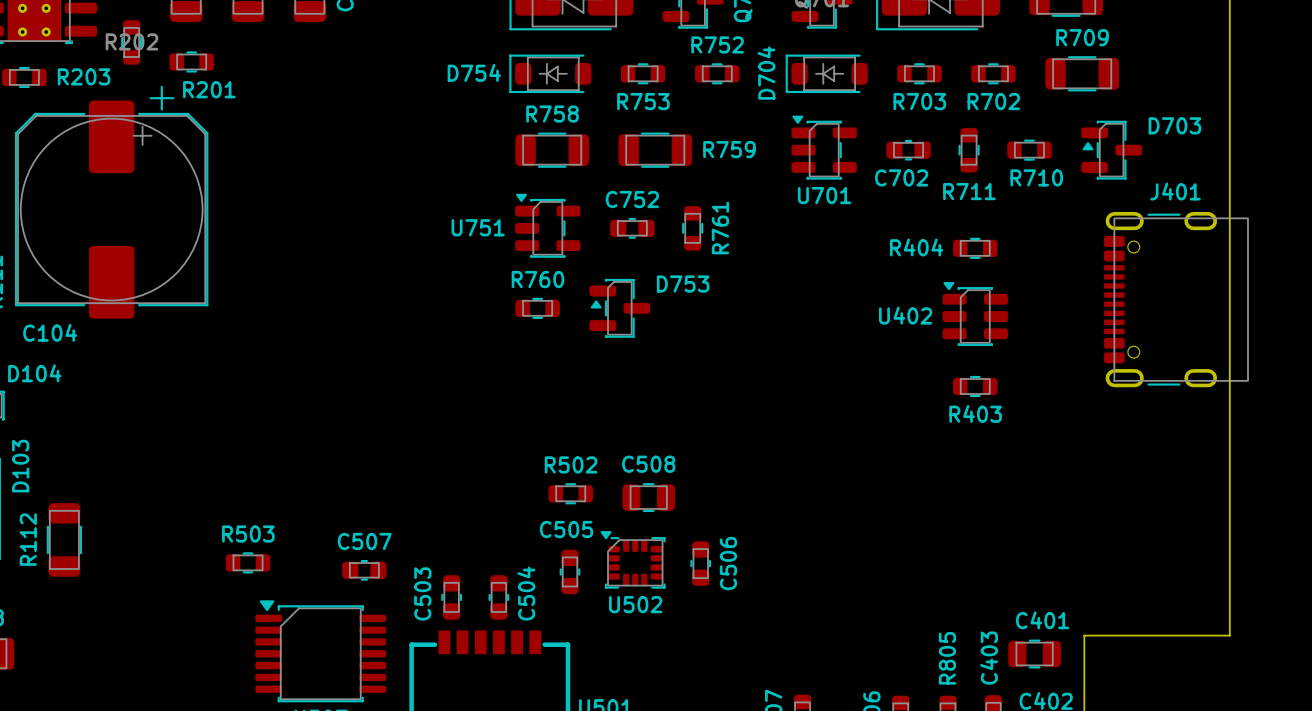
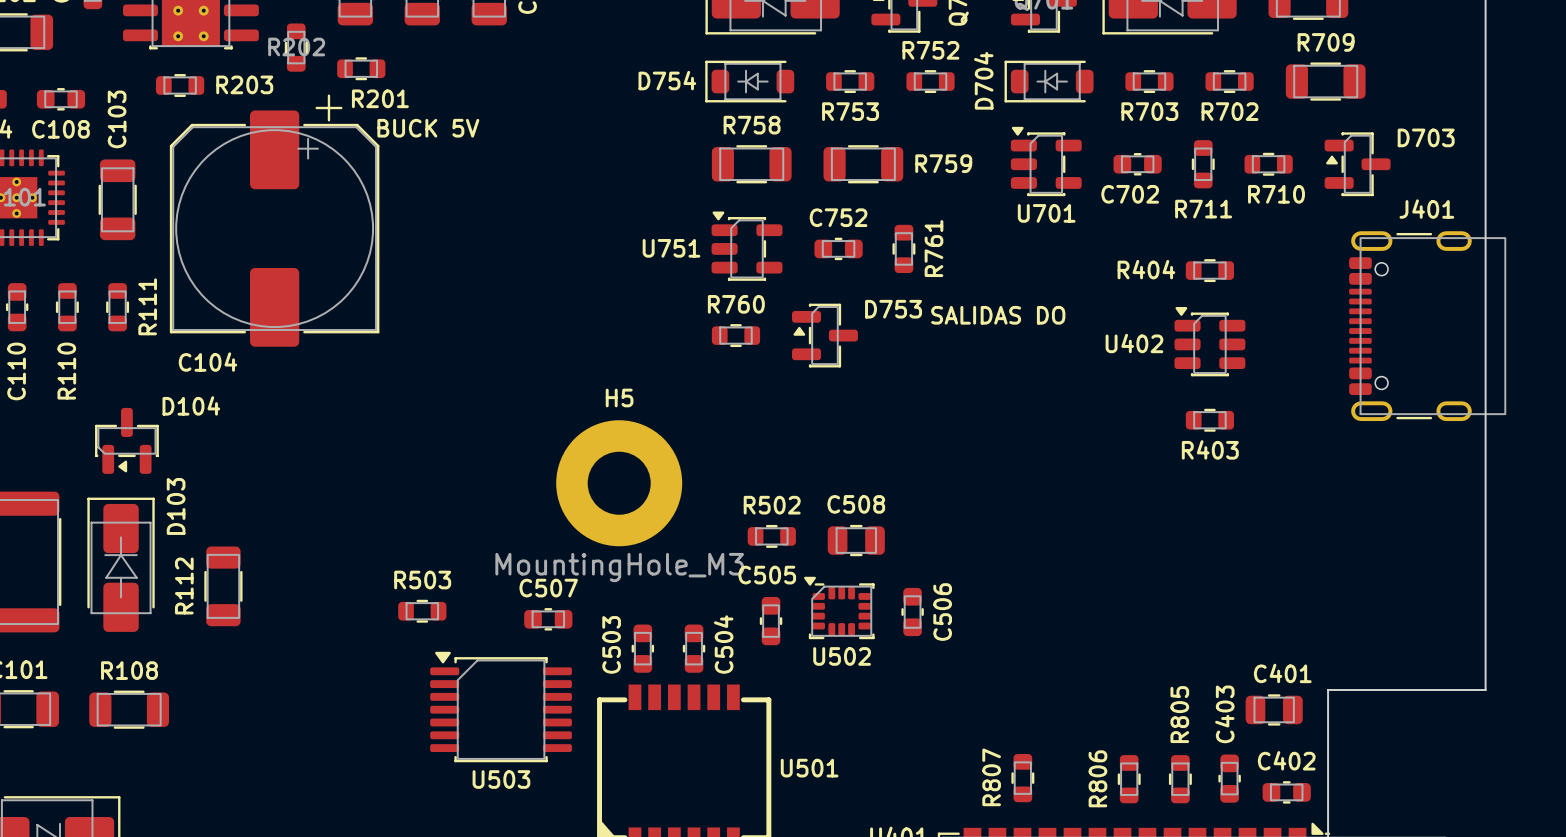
text: none -> BUCK 5V (428, 128)
text: none -> SALIDAS DO (998, 315)
H5: none -> MountingHole_M3 (619, 483)

